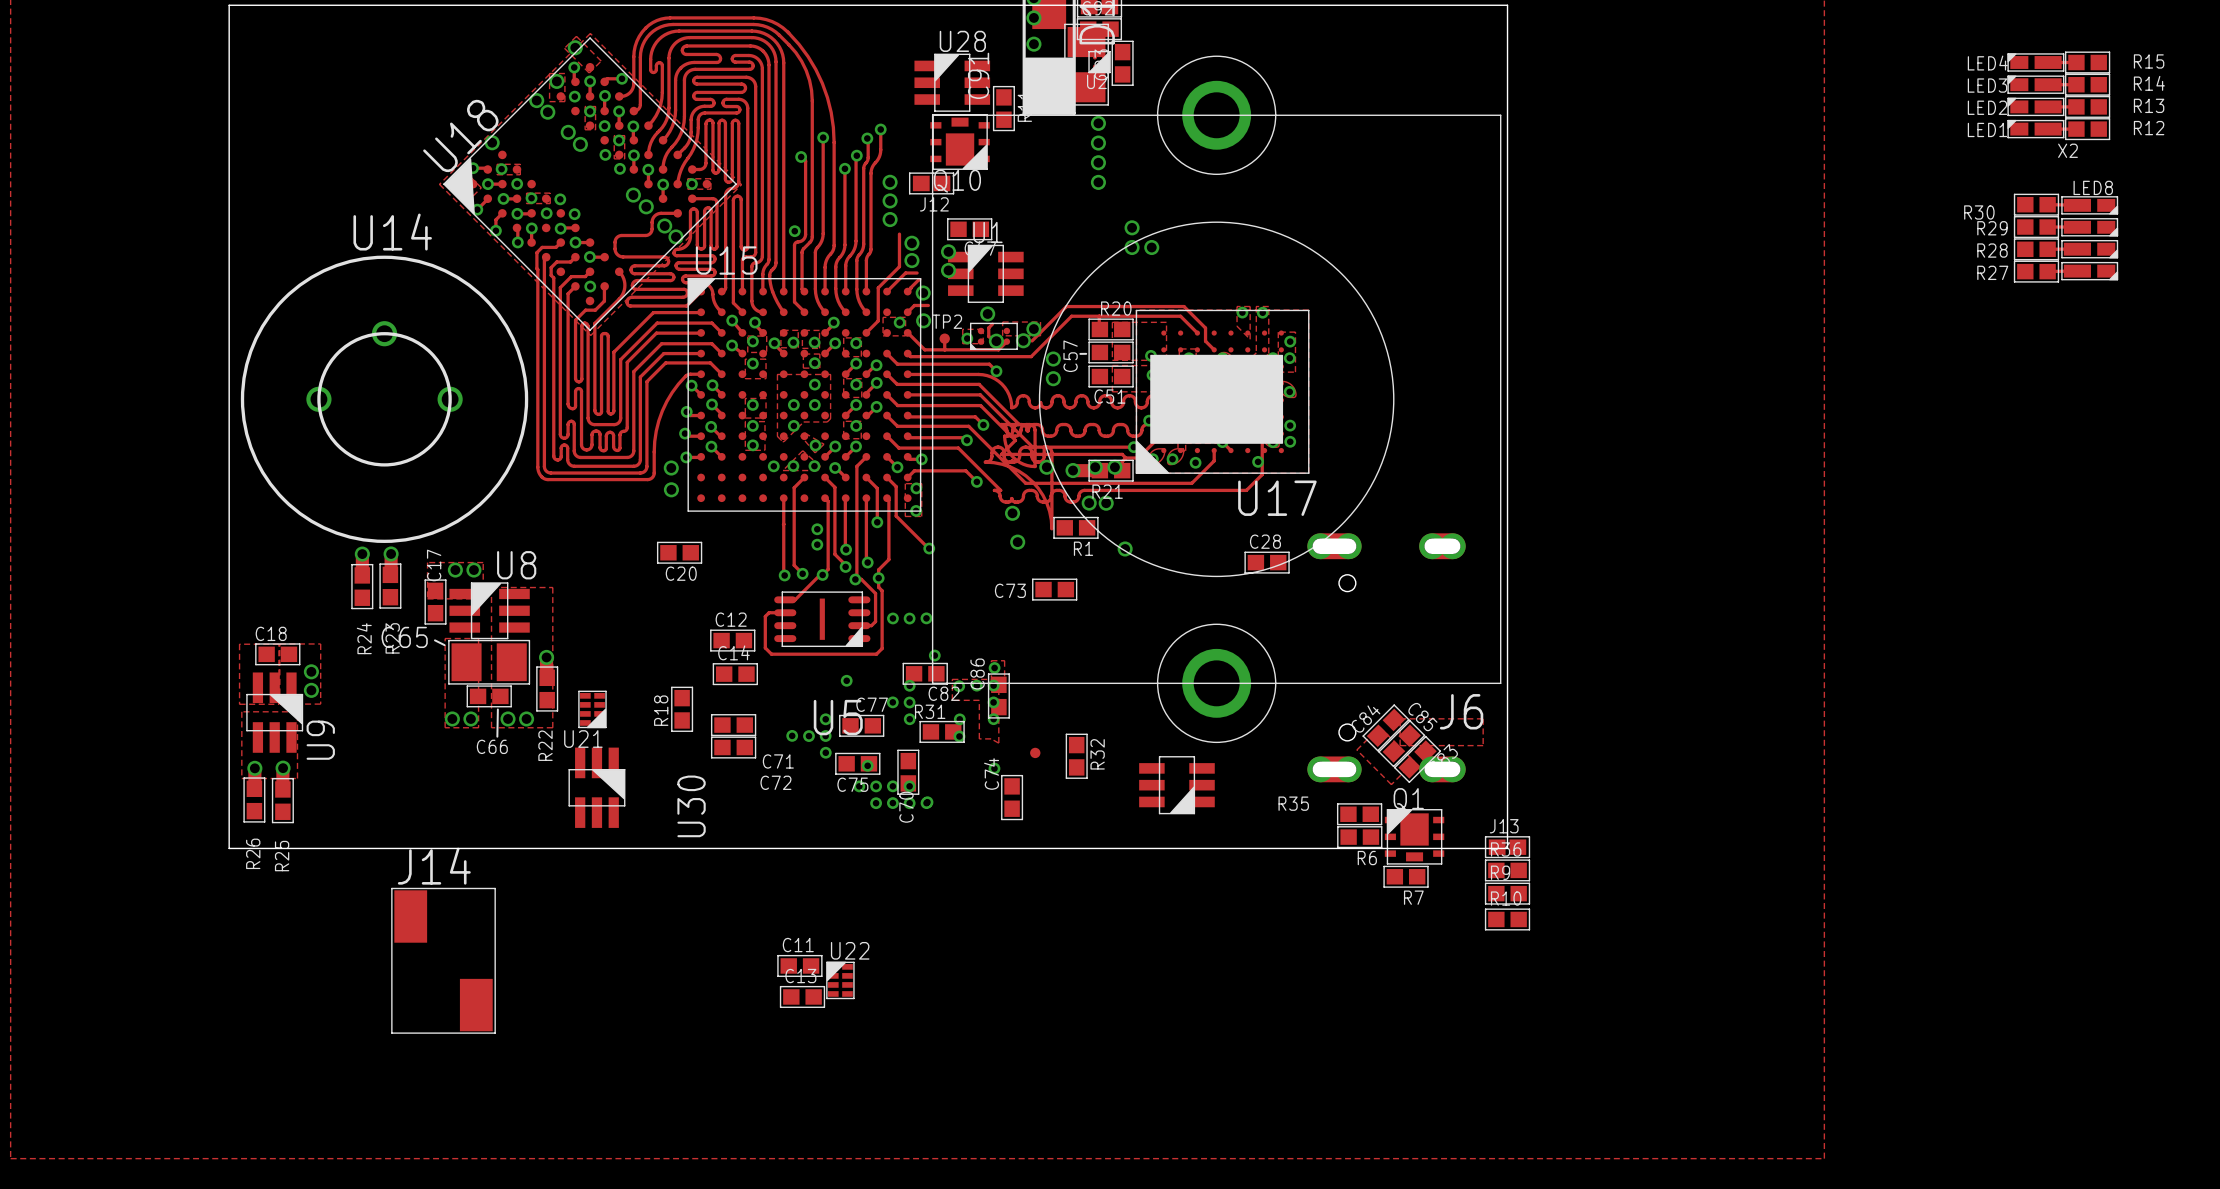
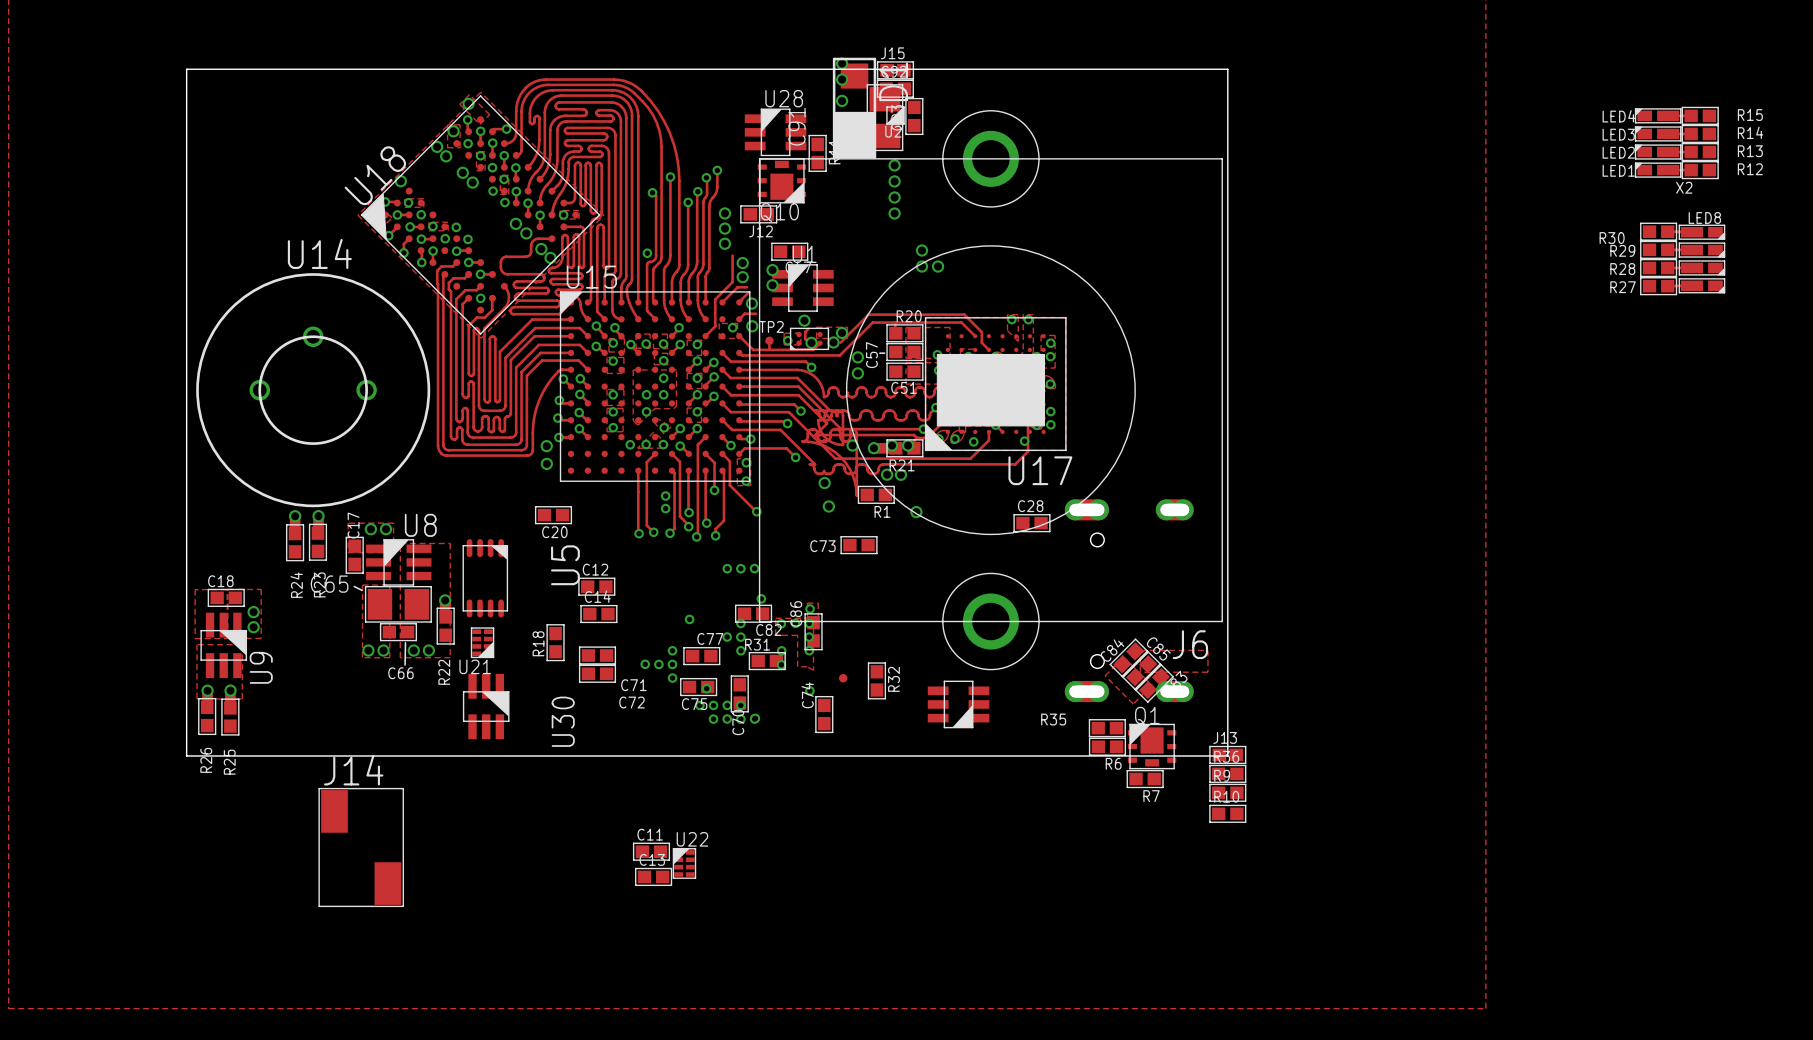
track: (822, 574) (820, 574) (795, 599) (785, 599) -> none
track: (878, 578) (878, 587) (882, 590) (882, 648) (876, 654) (771, 654) (765, 647) (765, 616) (769, 612) (785, 612) -> none
track: (855, 579) (861, 579) (875, 593) (875, 621) (871, 625) (859, 625) -> none
U5 footprint: [774, 591, 871, 647] -> [462, 539, 508, 618]
U5 name position: U5 (838, 717) -> U5 (565, 565)

